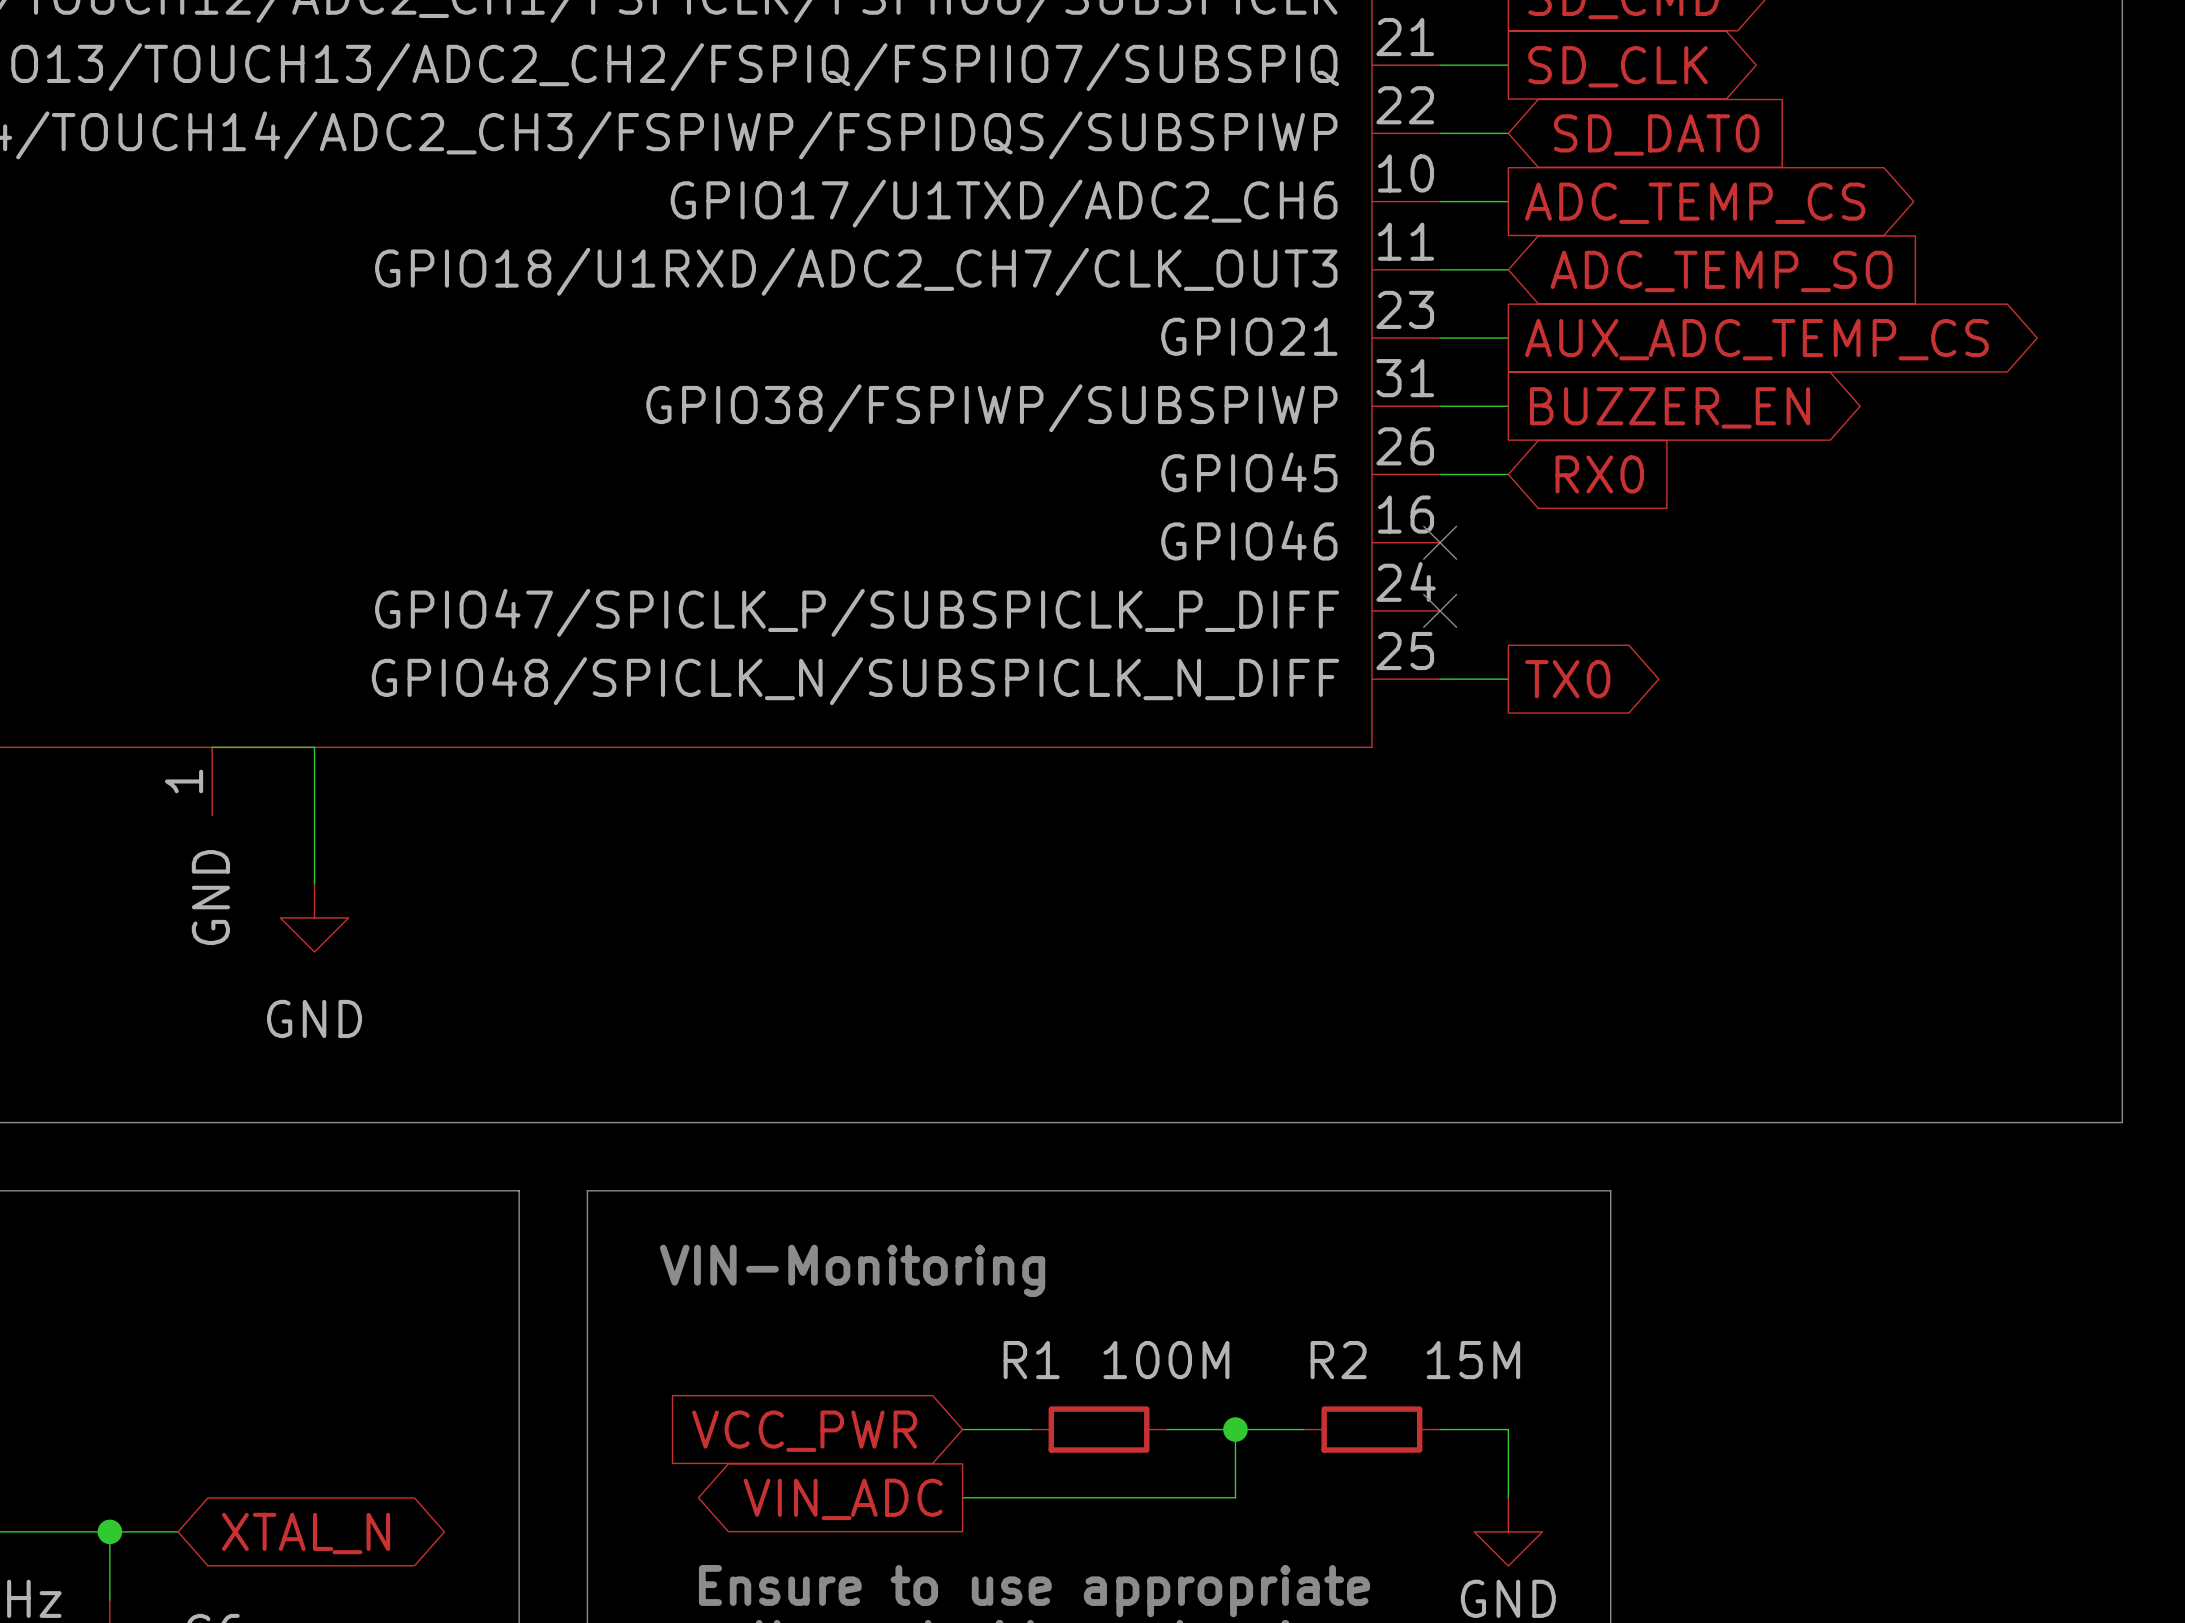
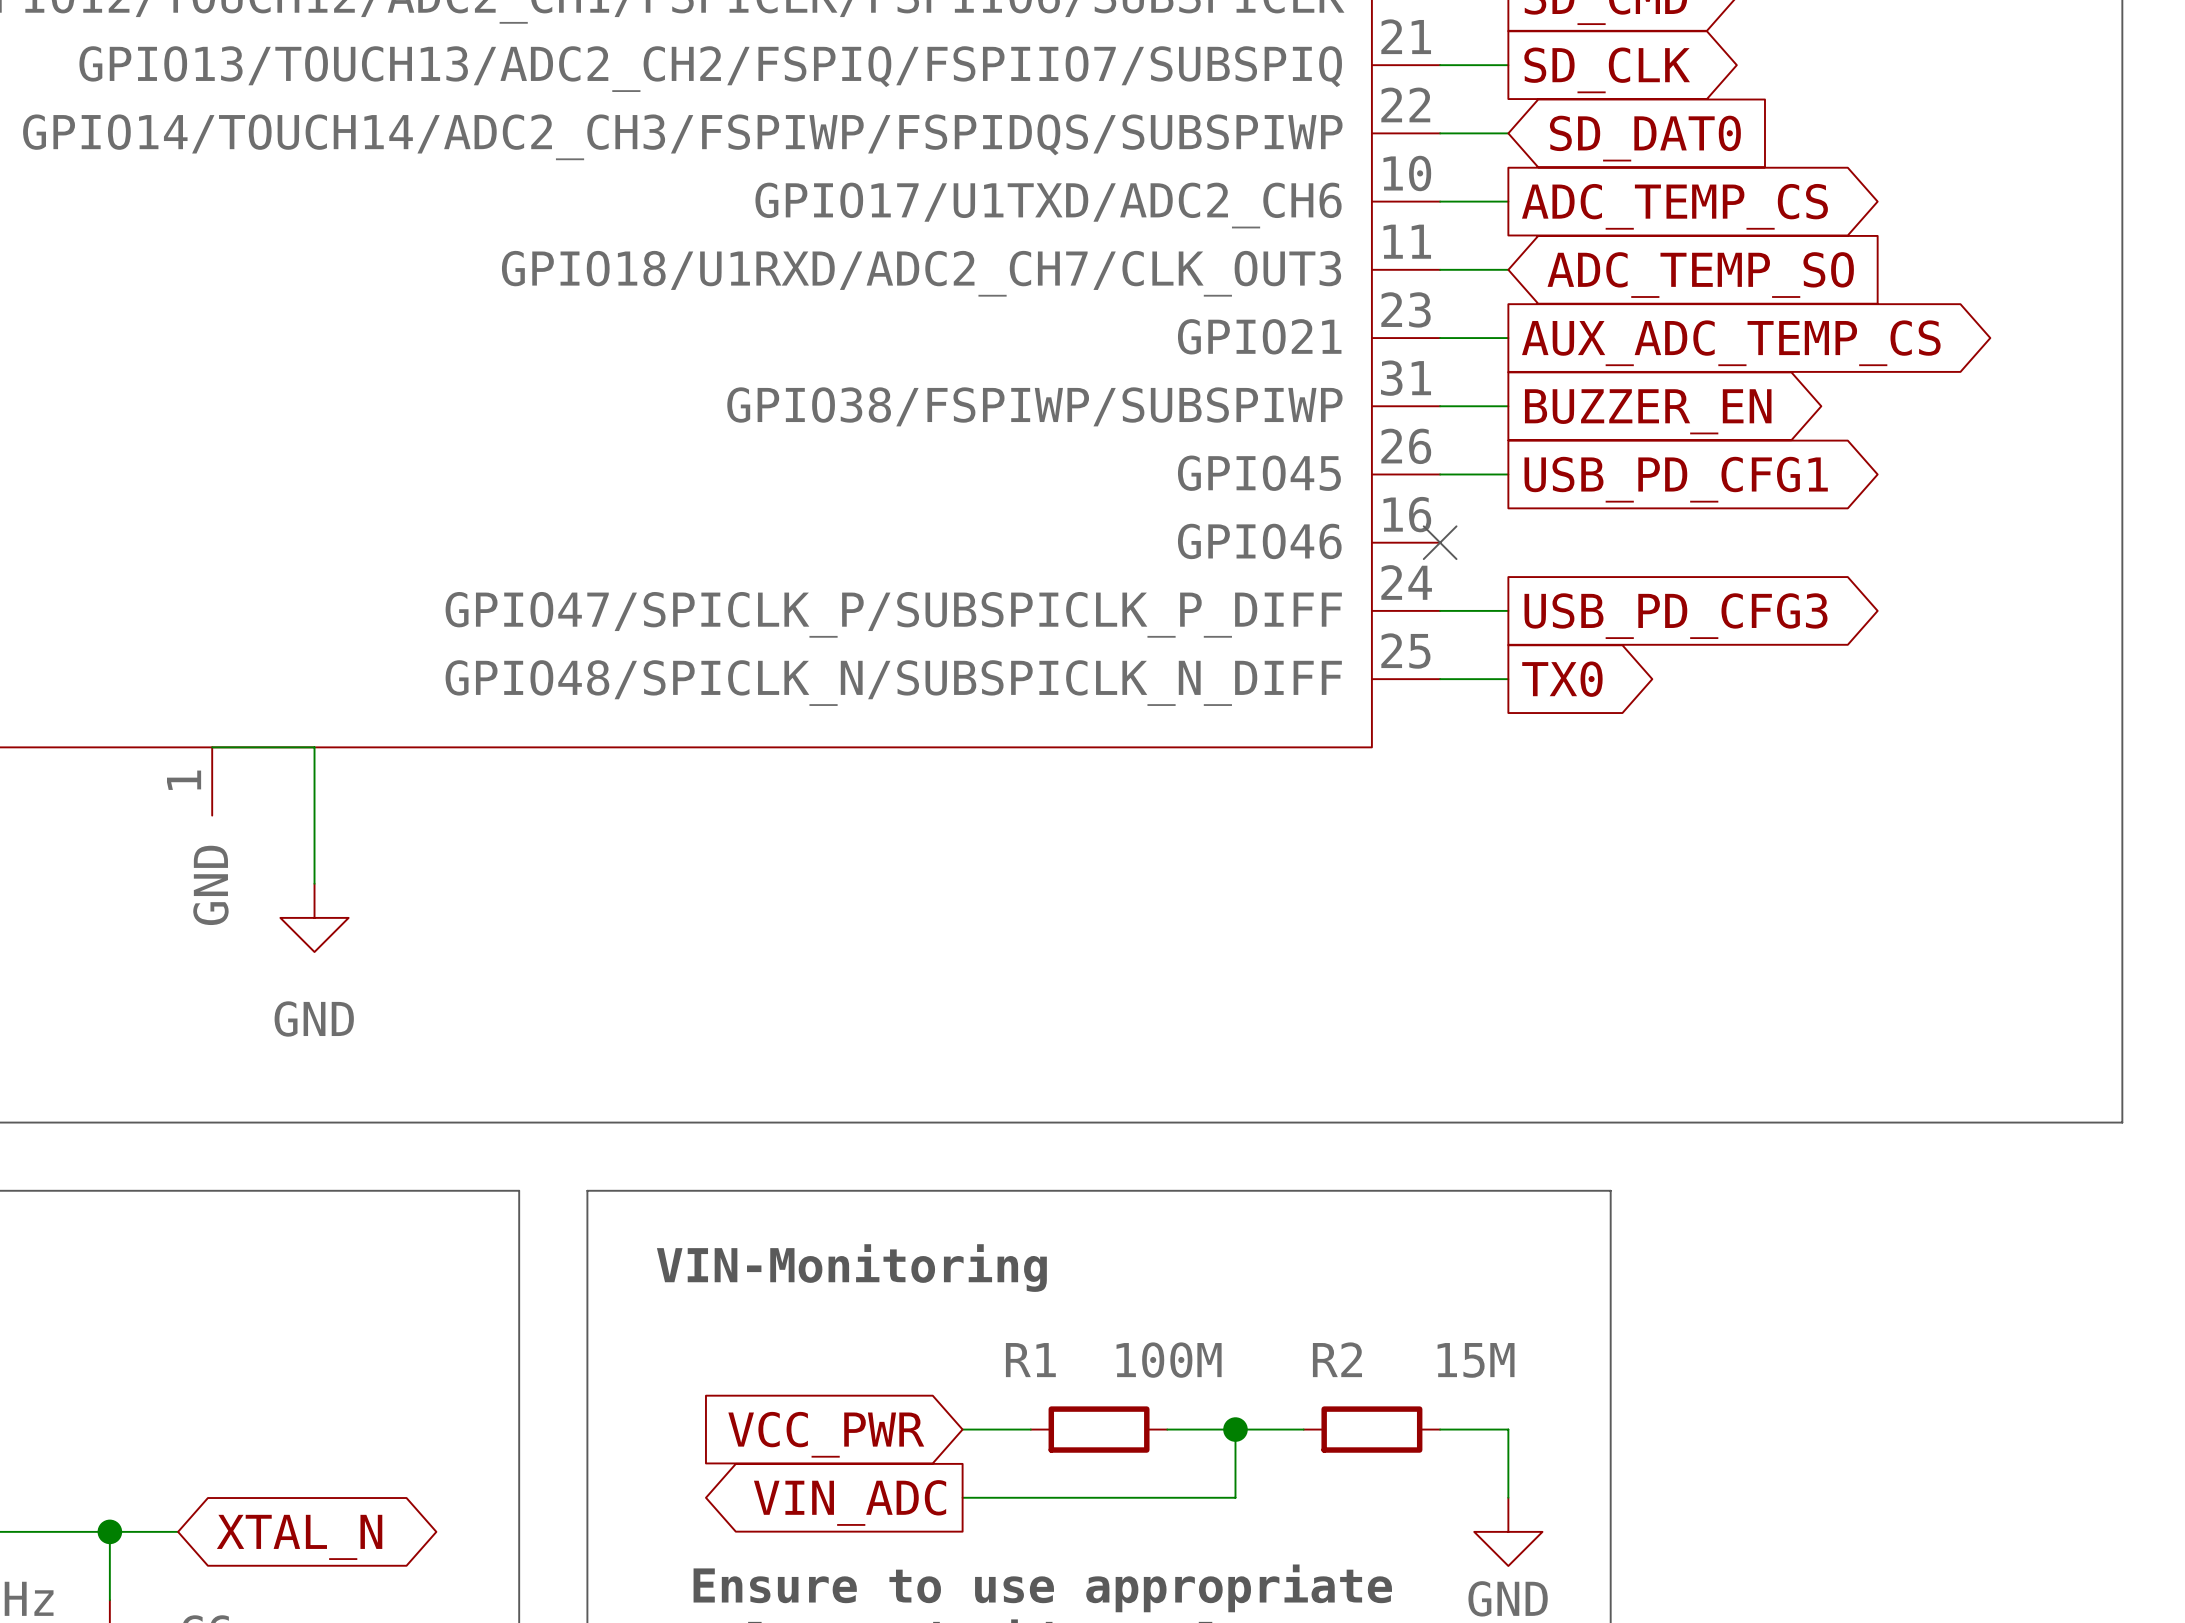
global label shape: input (1599, 474) -> output (1676, 479)
global label: RX0 (1599, 474) -> USB_PD_CFG1 (1676, 479)
wire: none -> (1440, 610) (1508, 610)
no-connect mark: (1440, 610) -> none
global label: none -> USB_PD_CFG3 (1675, 616)

